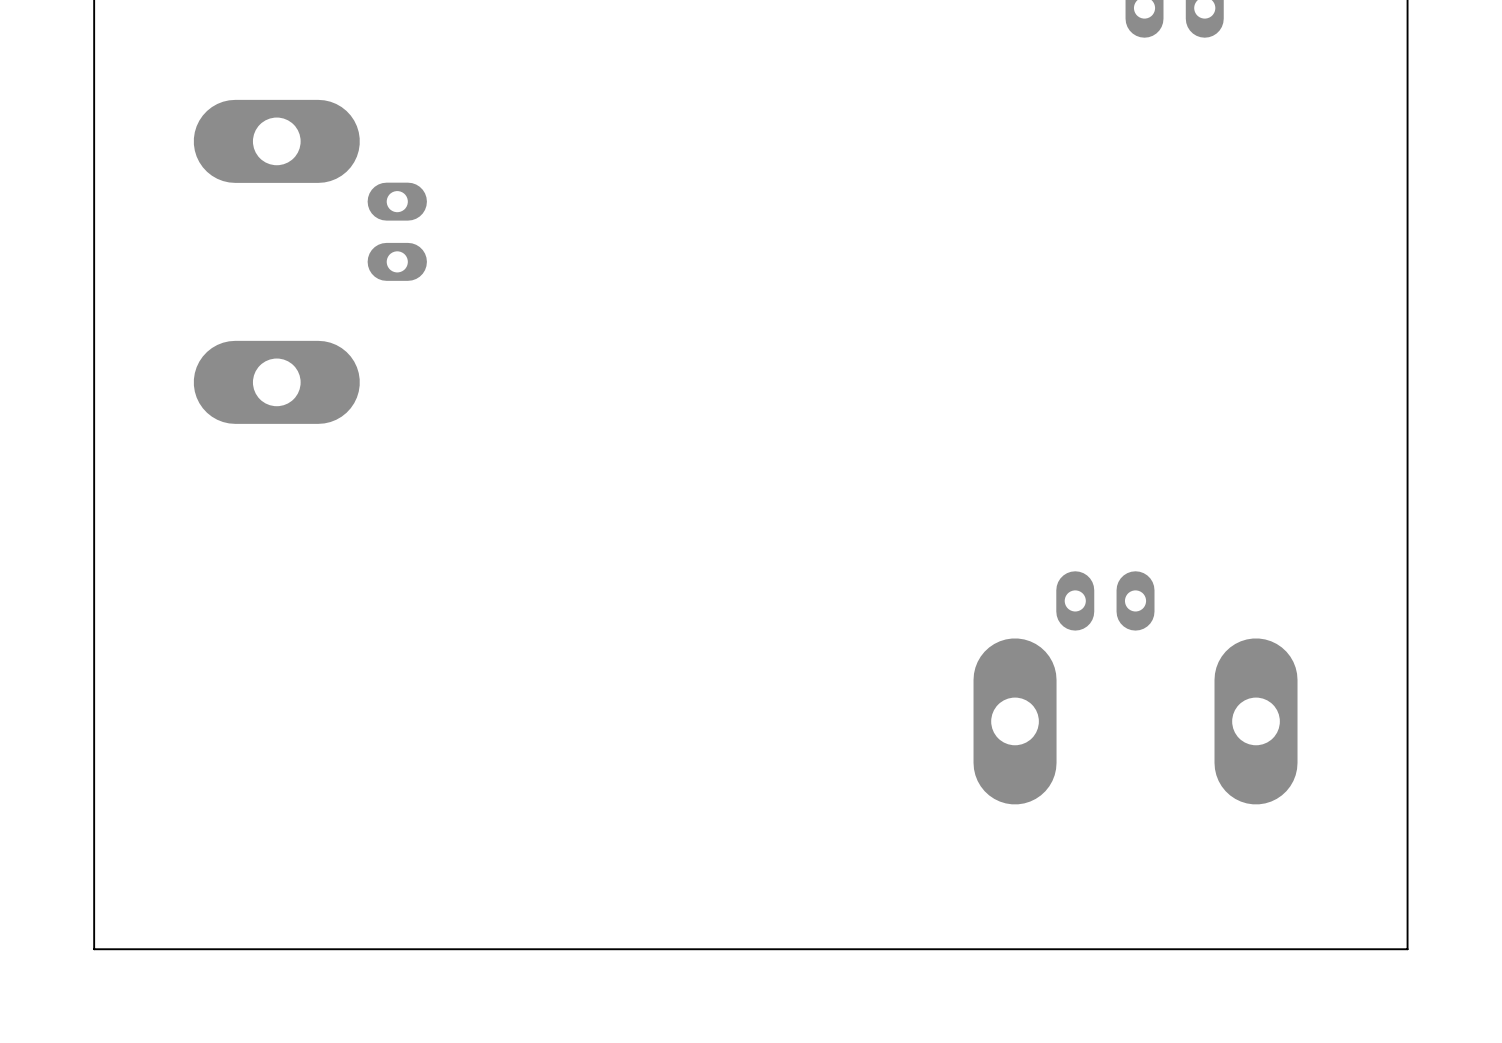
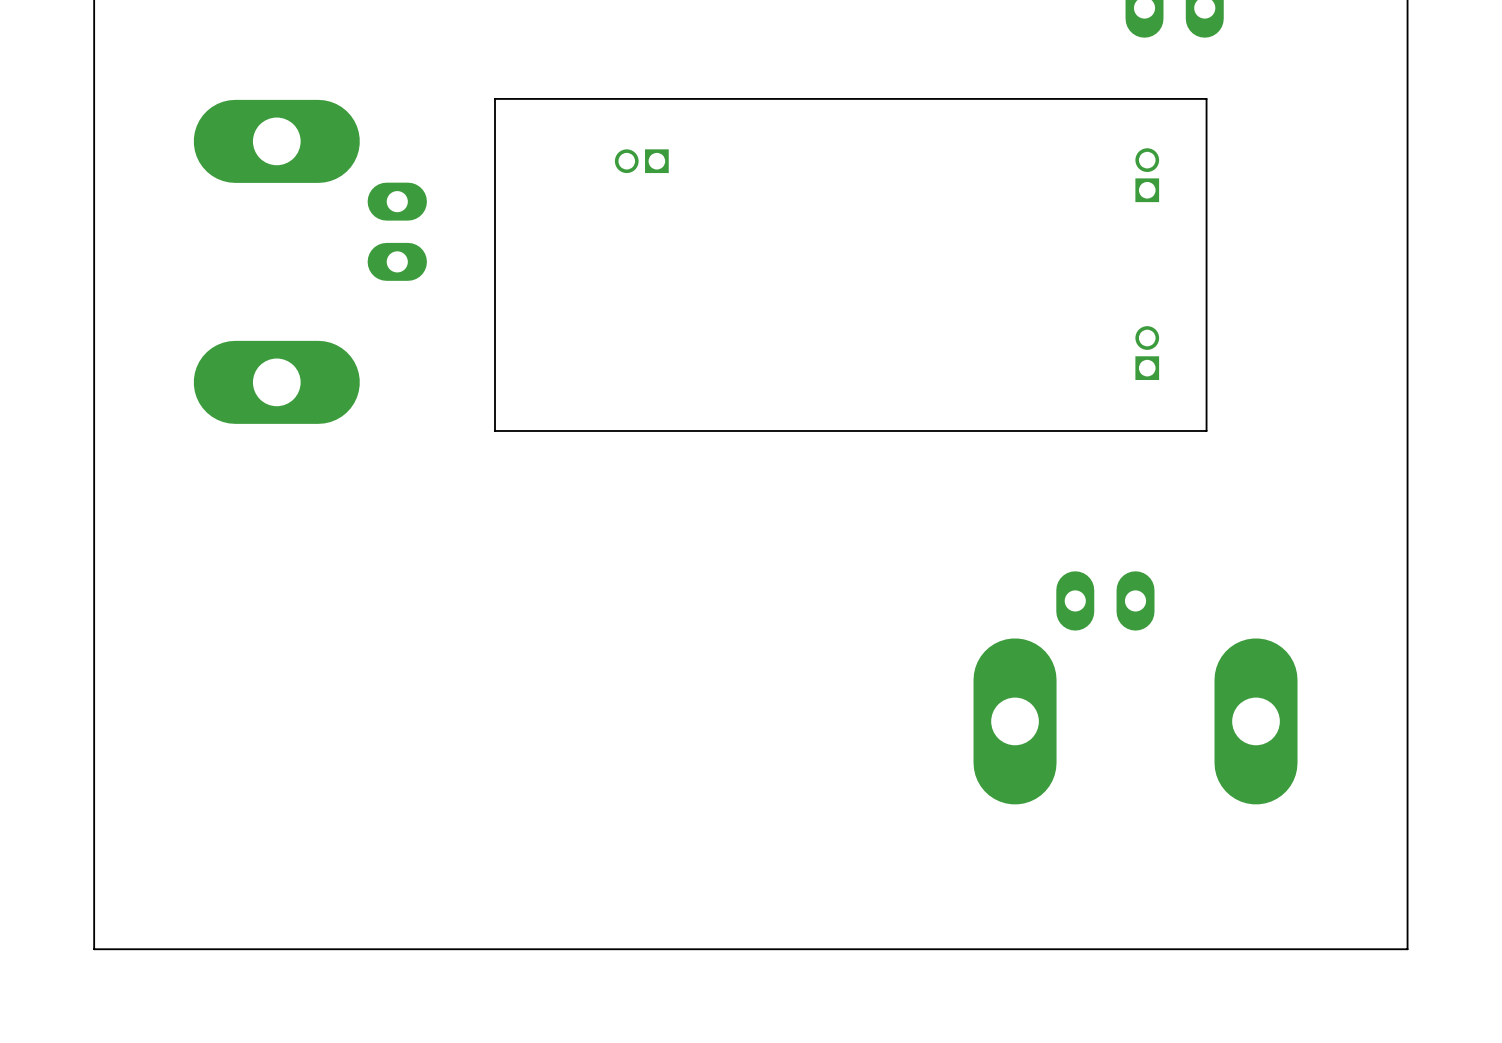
board edge: none -> (1206, 98) (495, 98) (495, 430) (1206, 430) (1206, 98)
part: none -> (641, 161)
part: none -> (1147, 175)
part: none -> (1147, 353)

